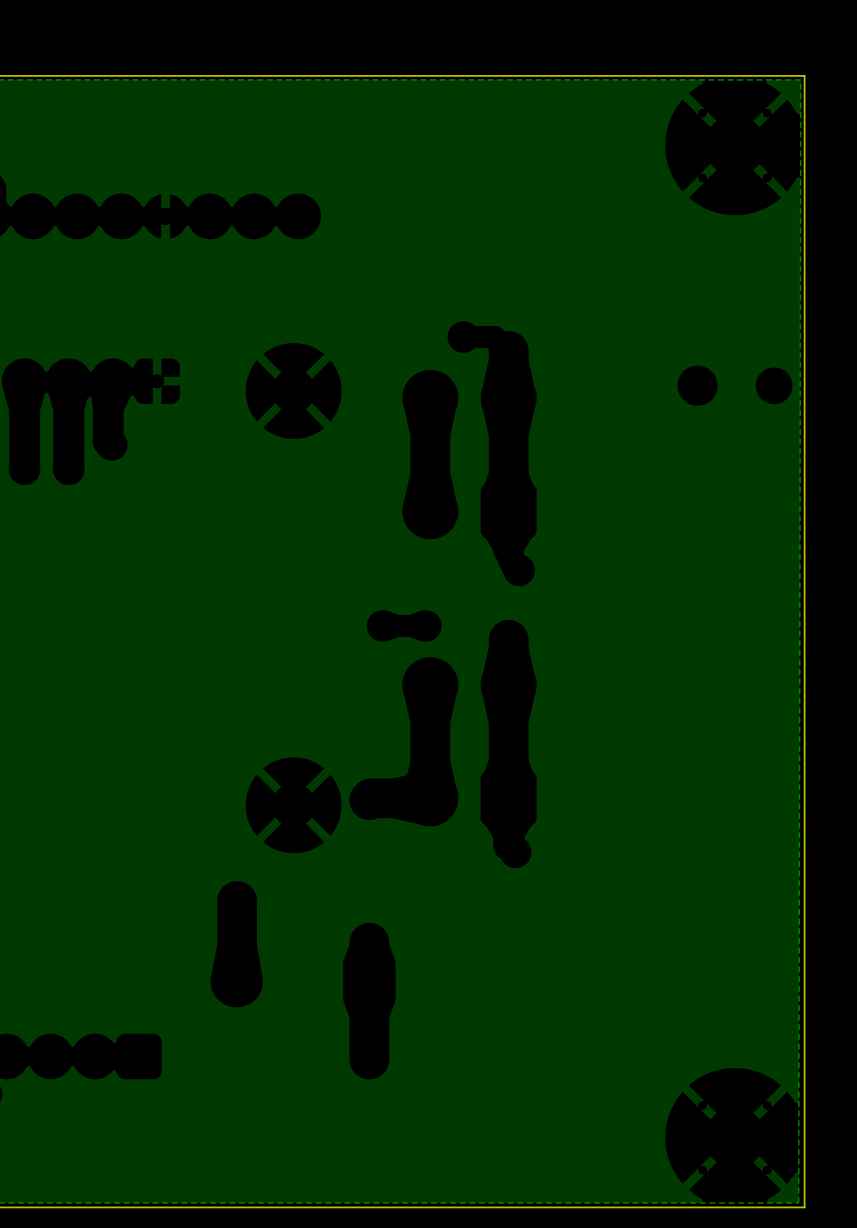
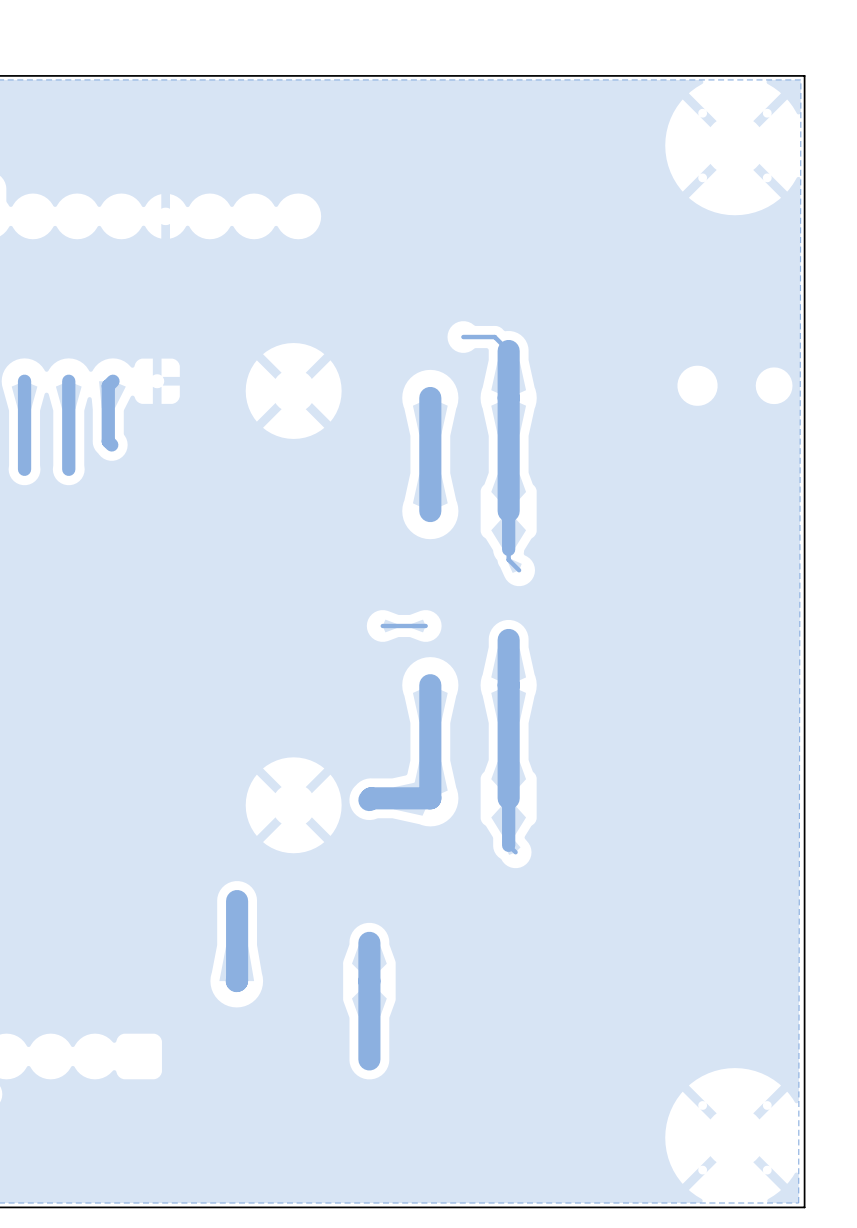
track: none -> (463, 337) (494, 337) (508, 350) (508, 559) (519, 570)
track: none -> (24, 381) (24, 469)
track: none -> (68, 381) (68, 469)
track: none -> (112, 381) (108, 385) (108, 441) (111, 444)
track: none -> (430, 397) (430, 511)
track: none -> (425, 625) (382, 625)
track: none -> (508, 639) (508, 845) (515, 852)
track: none -> (430, 685) (430, 798) (371, 798) (369, 800)
track: none -> (237, 901) (236, 981)
track: none -> (369, 942) (369, 1059)

